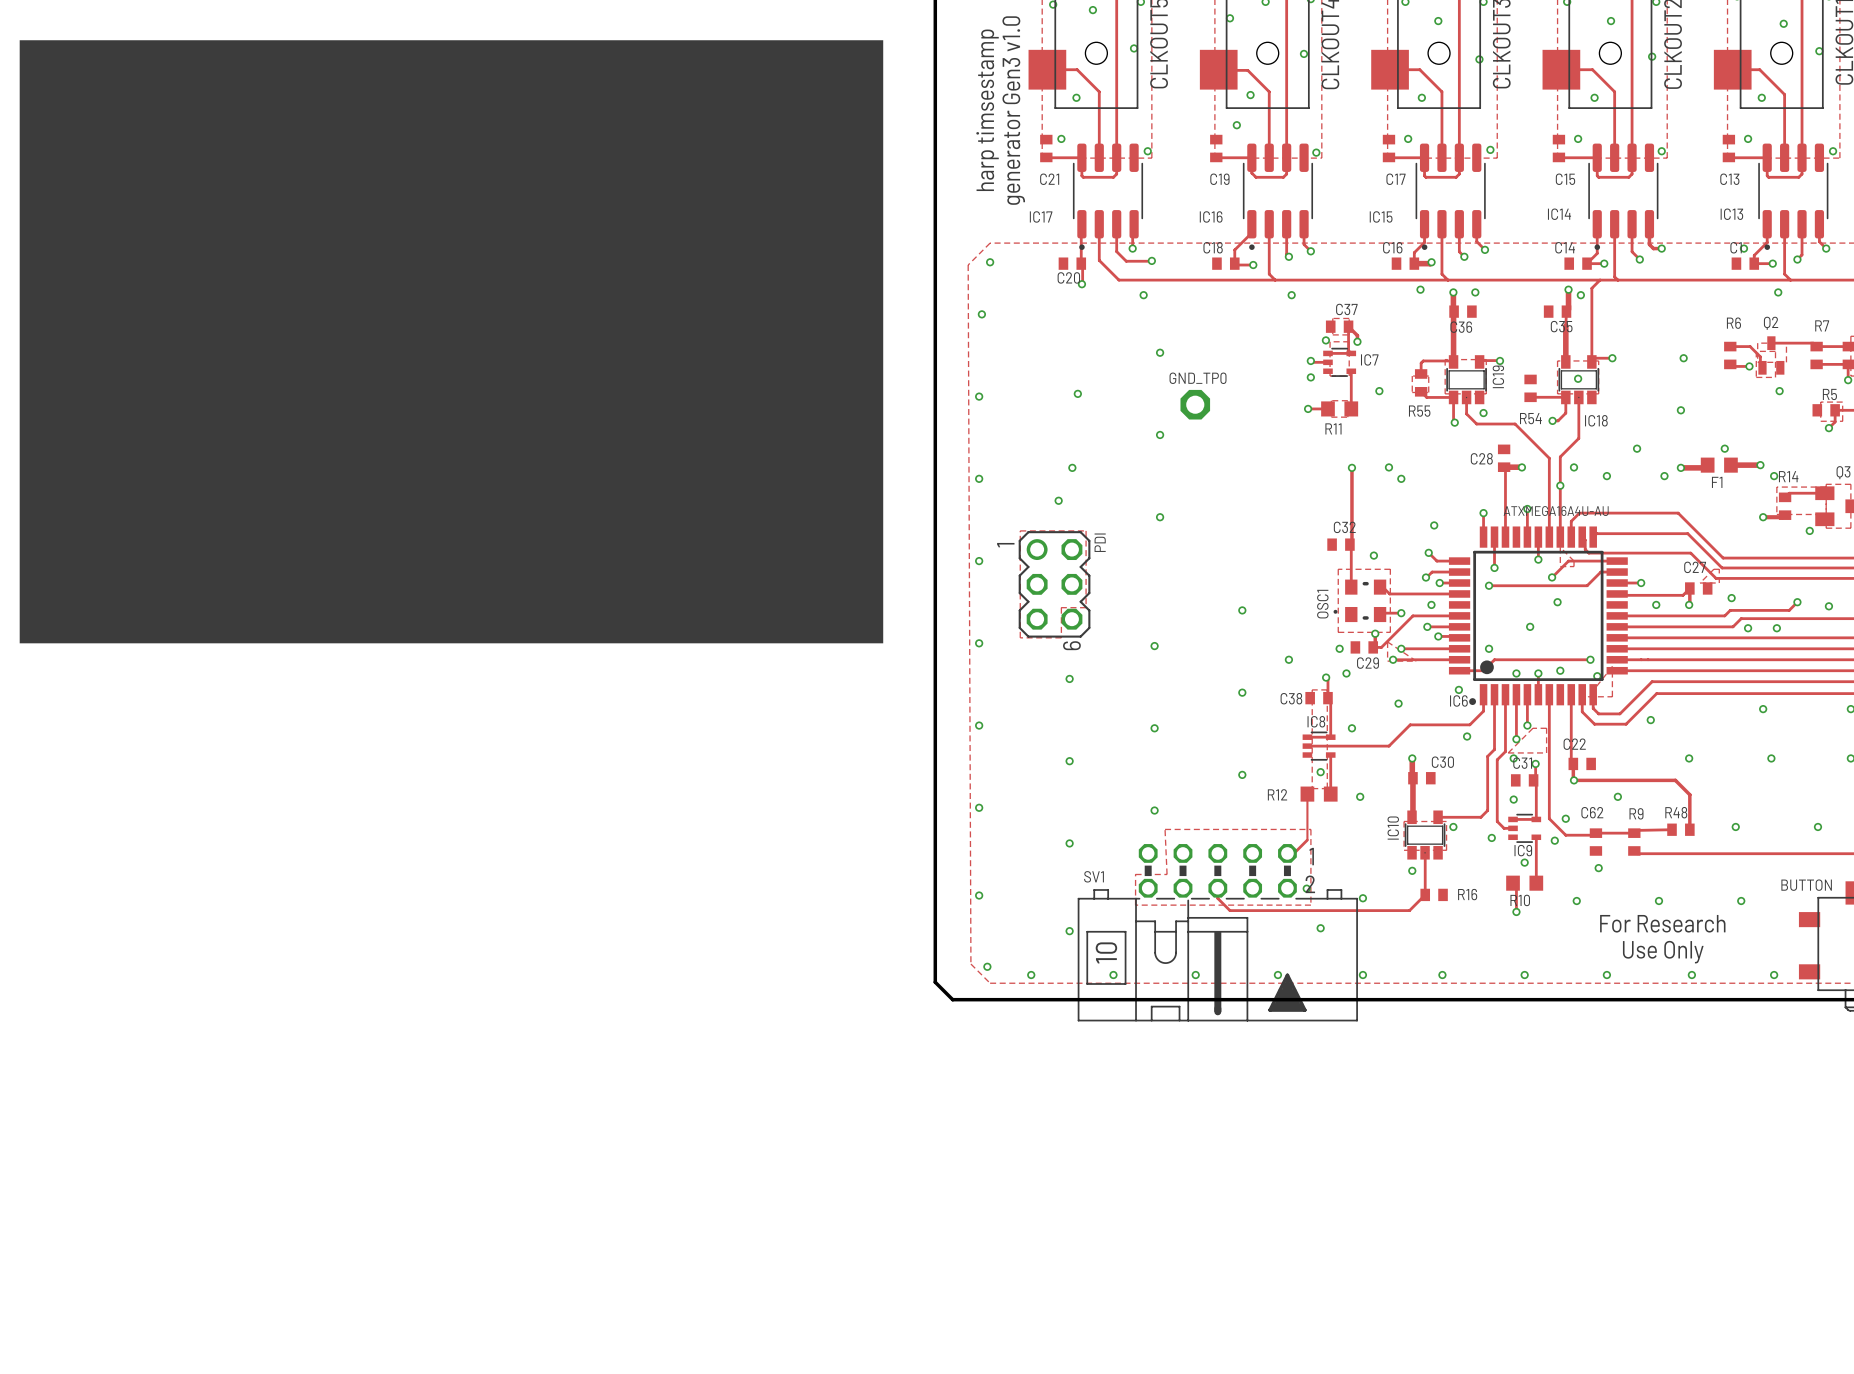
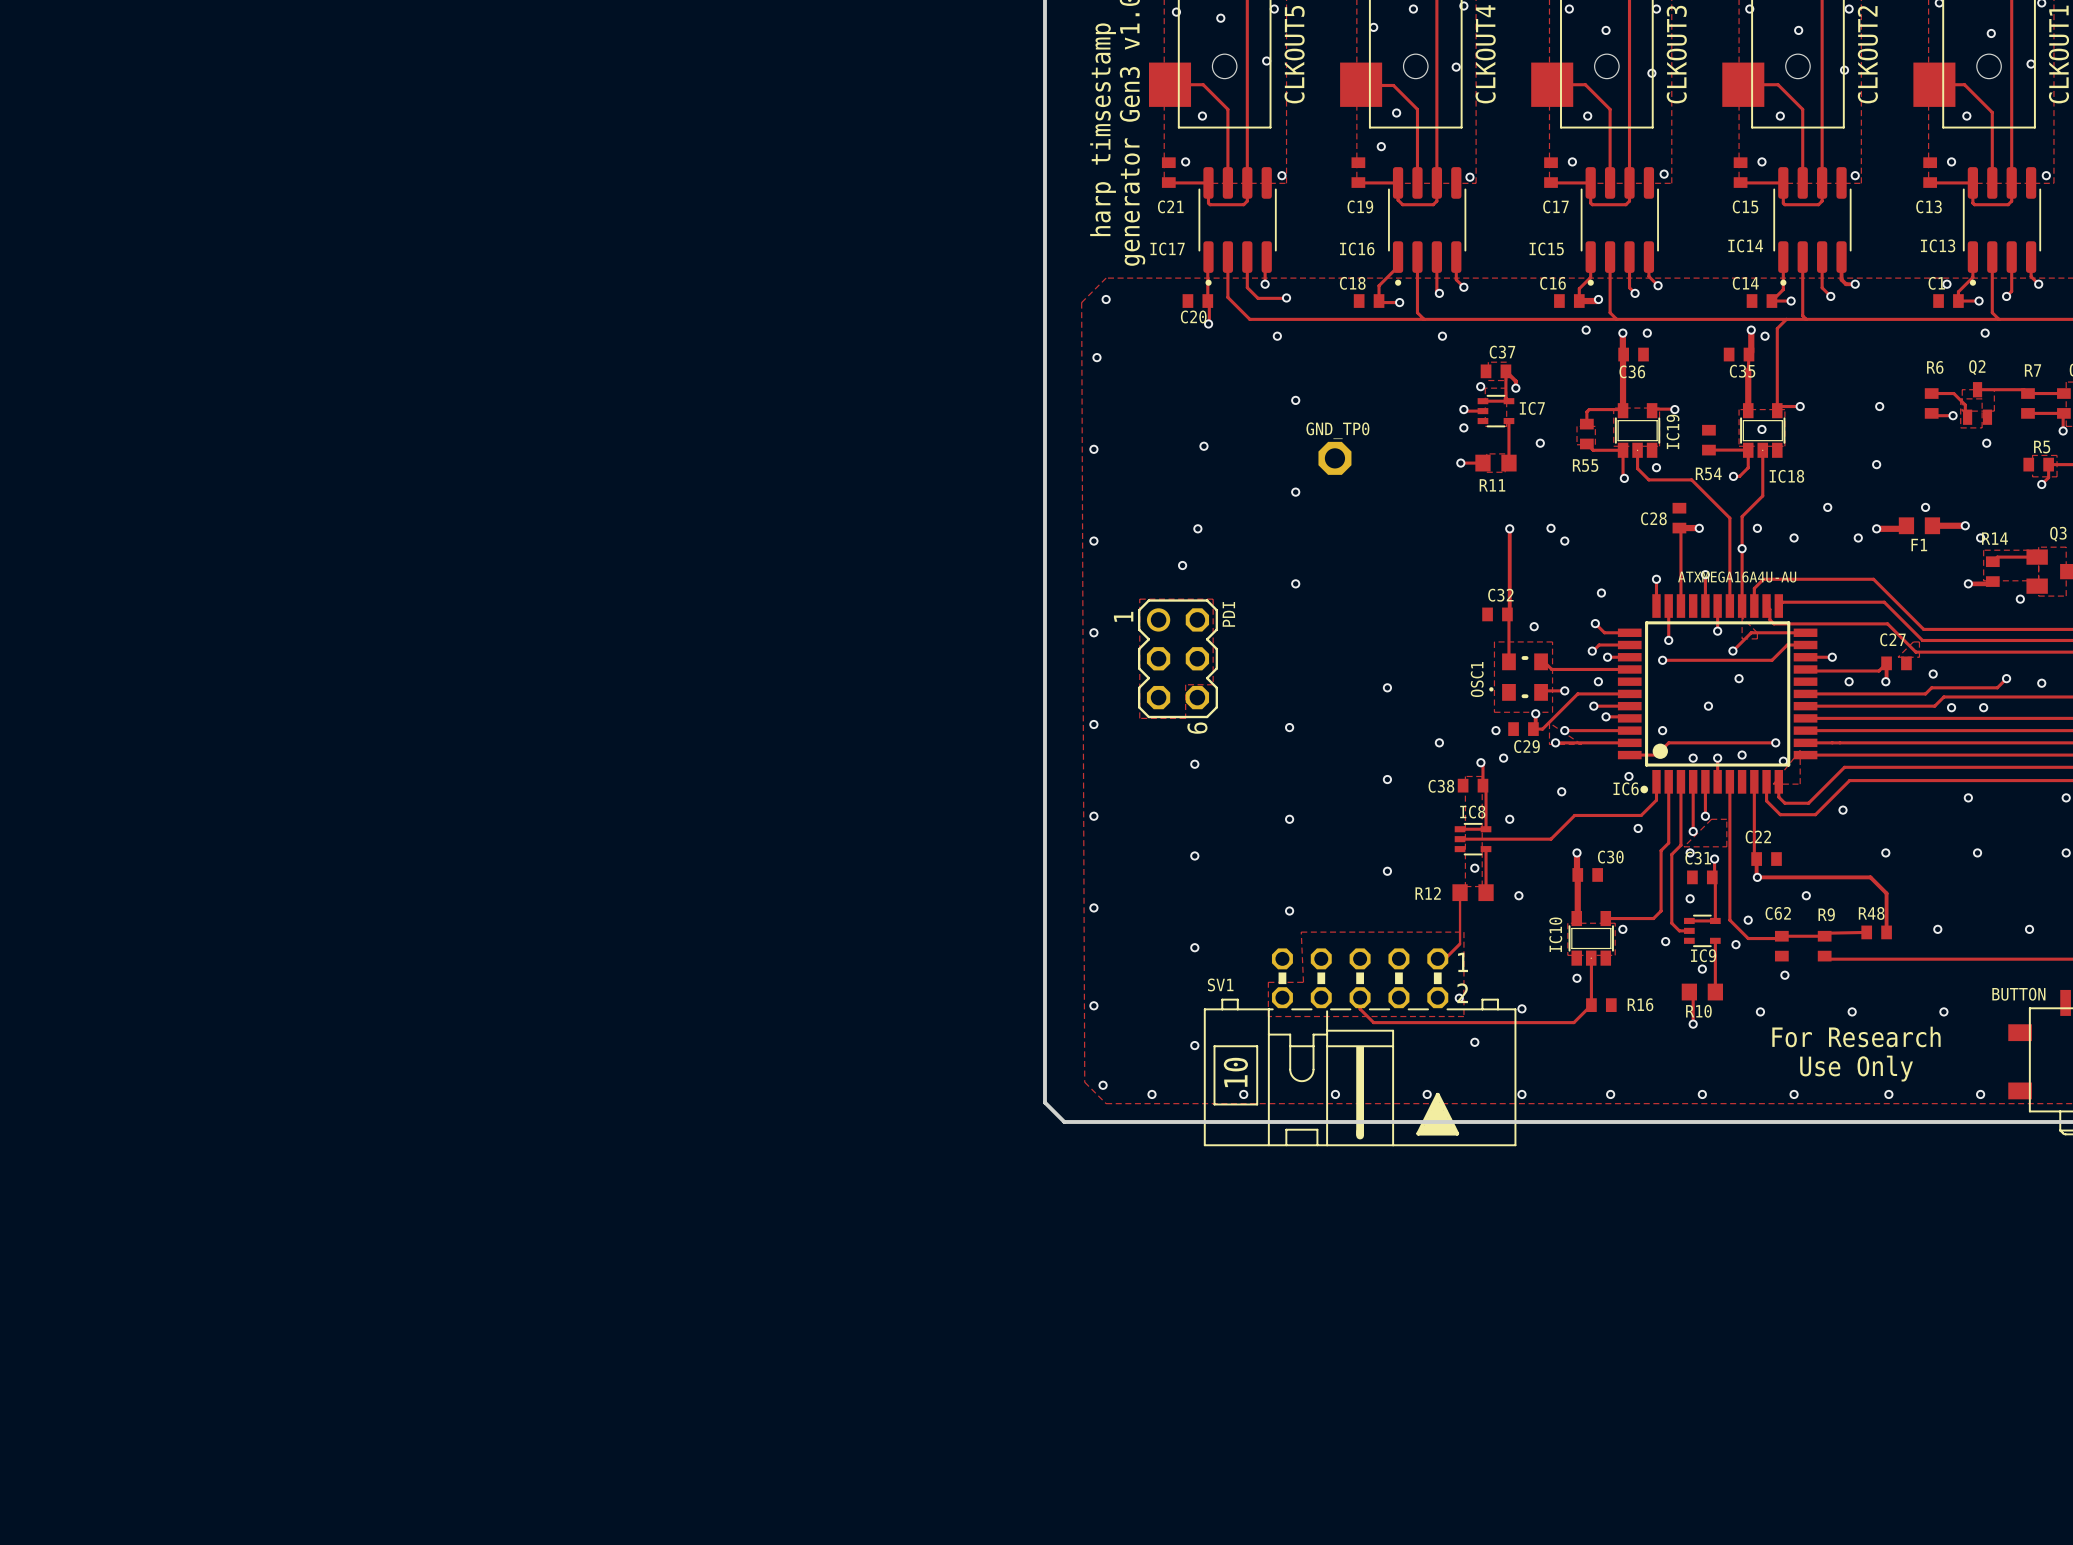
drawing: [19, 40, 884, 644] -> none

